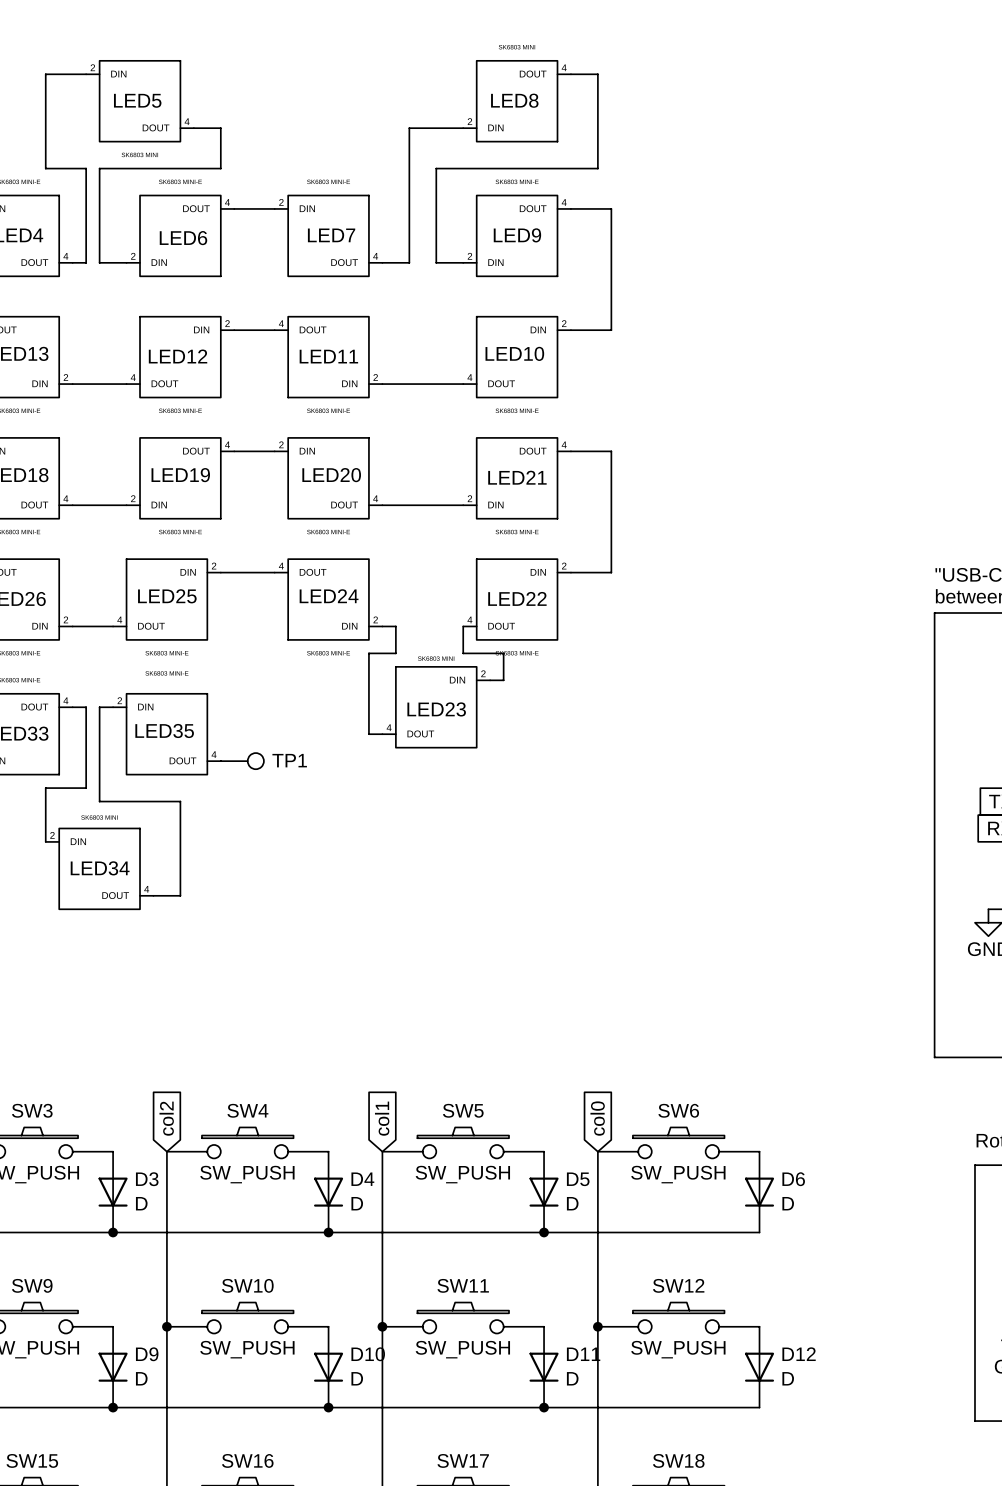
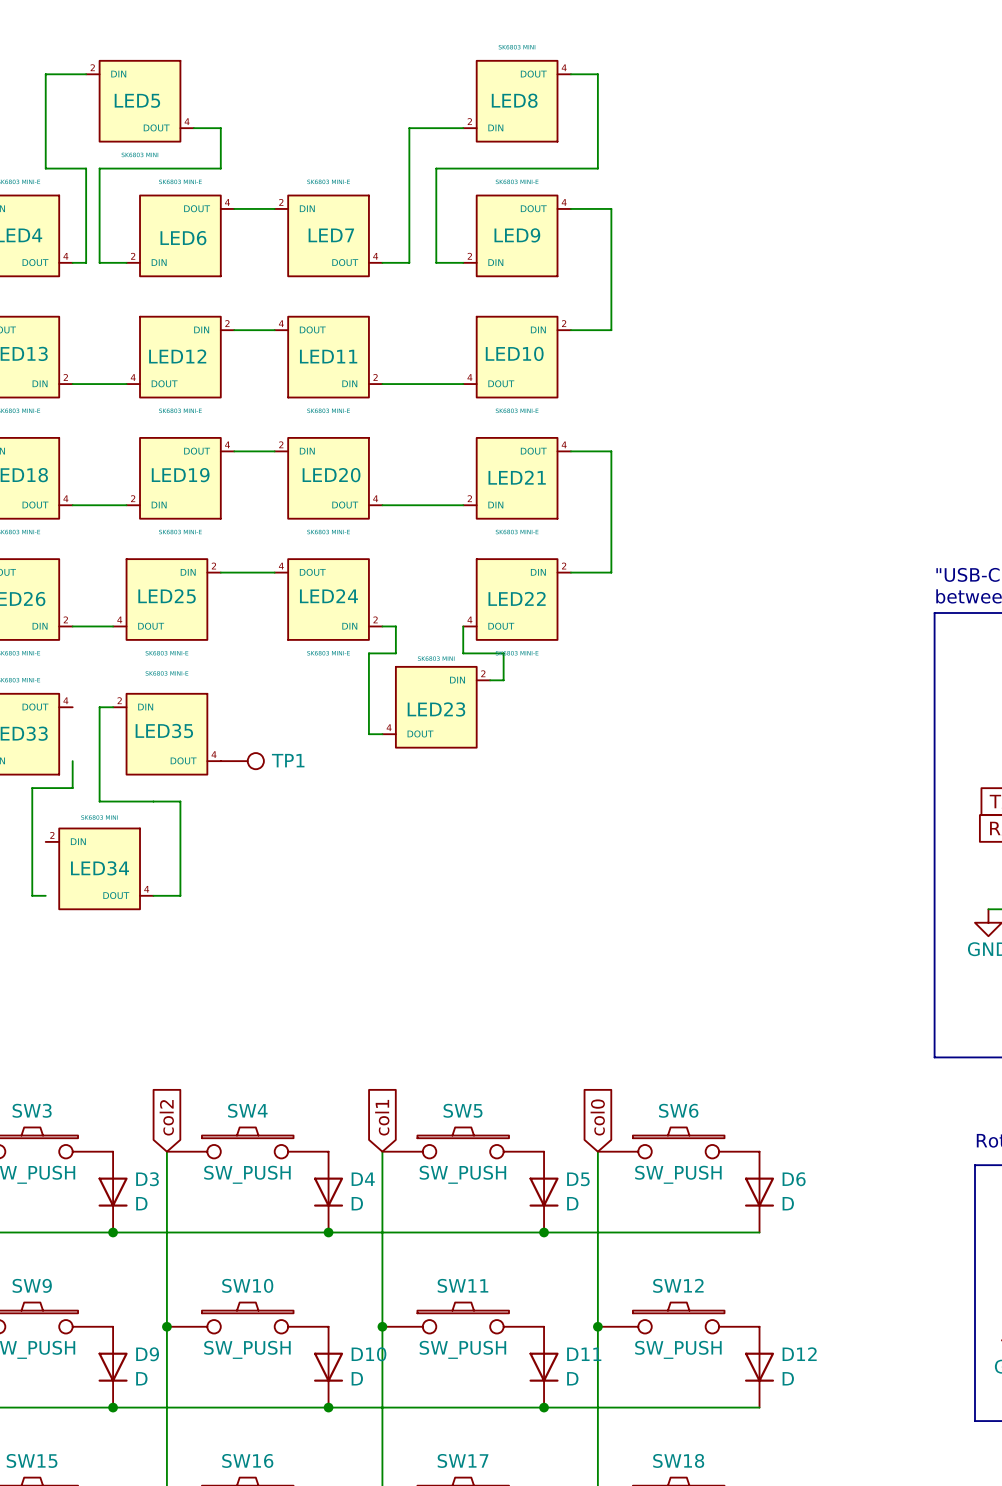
wire: (72, 707) (86, 707) (86, 788) (72, 788) -> (72, 761) (72, 788)
wire: (45, 788) (45, 841) -> (45, 788) (32, 788) (32, 895) (45, 895)

